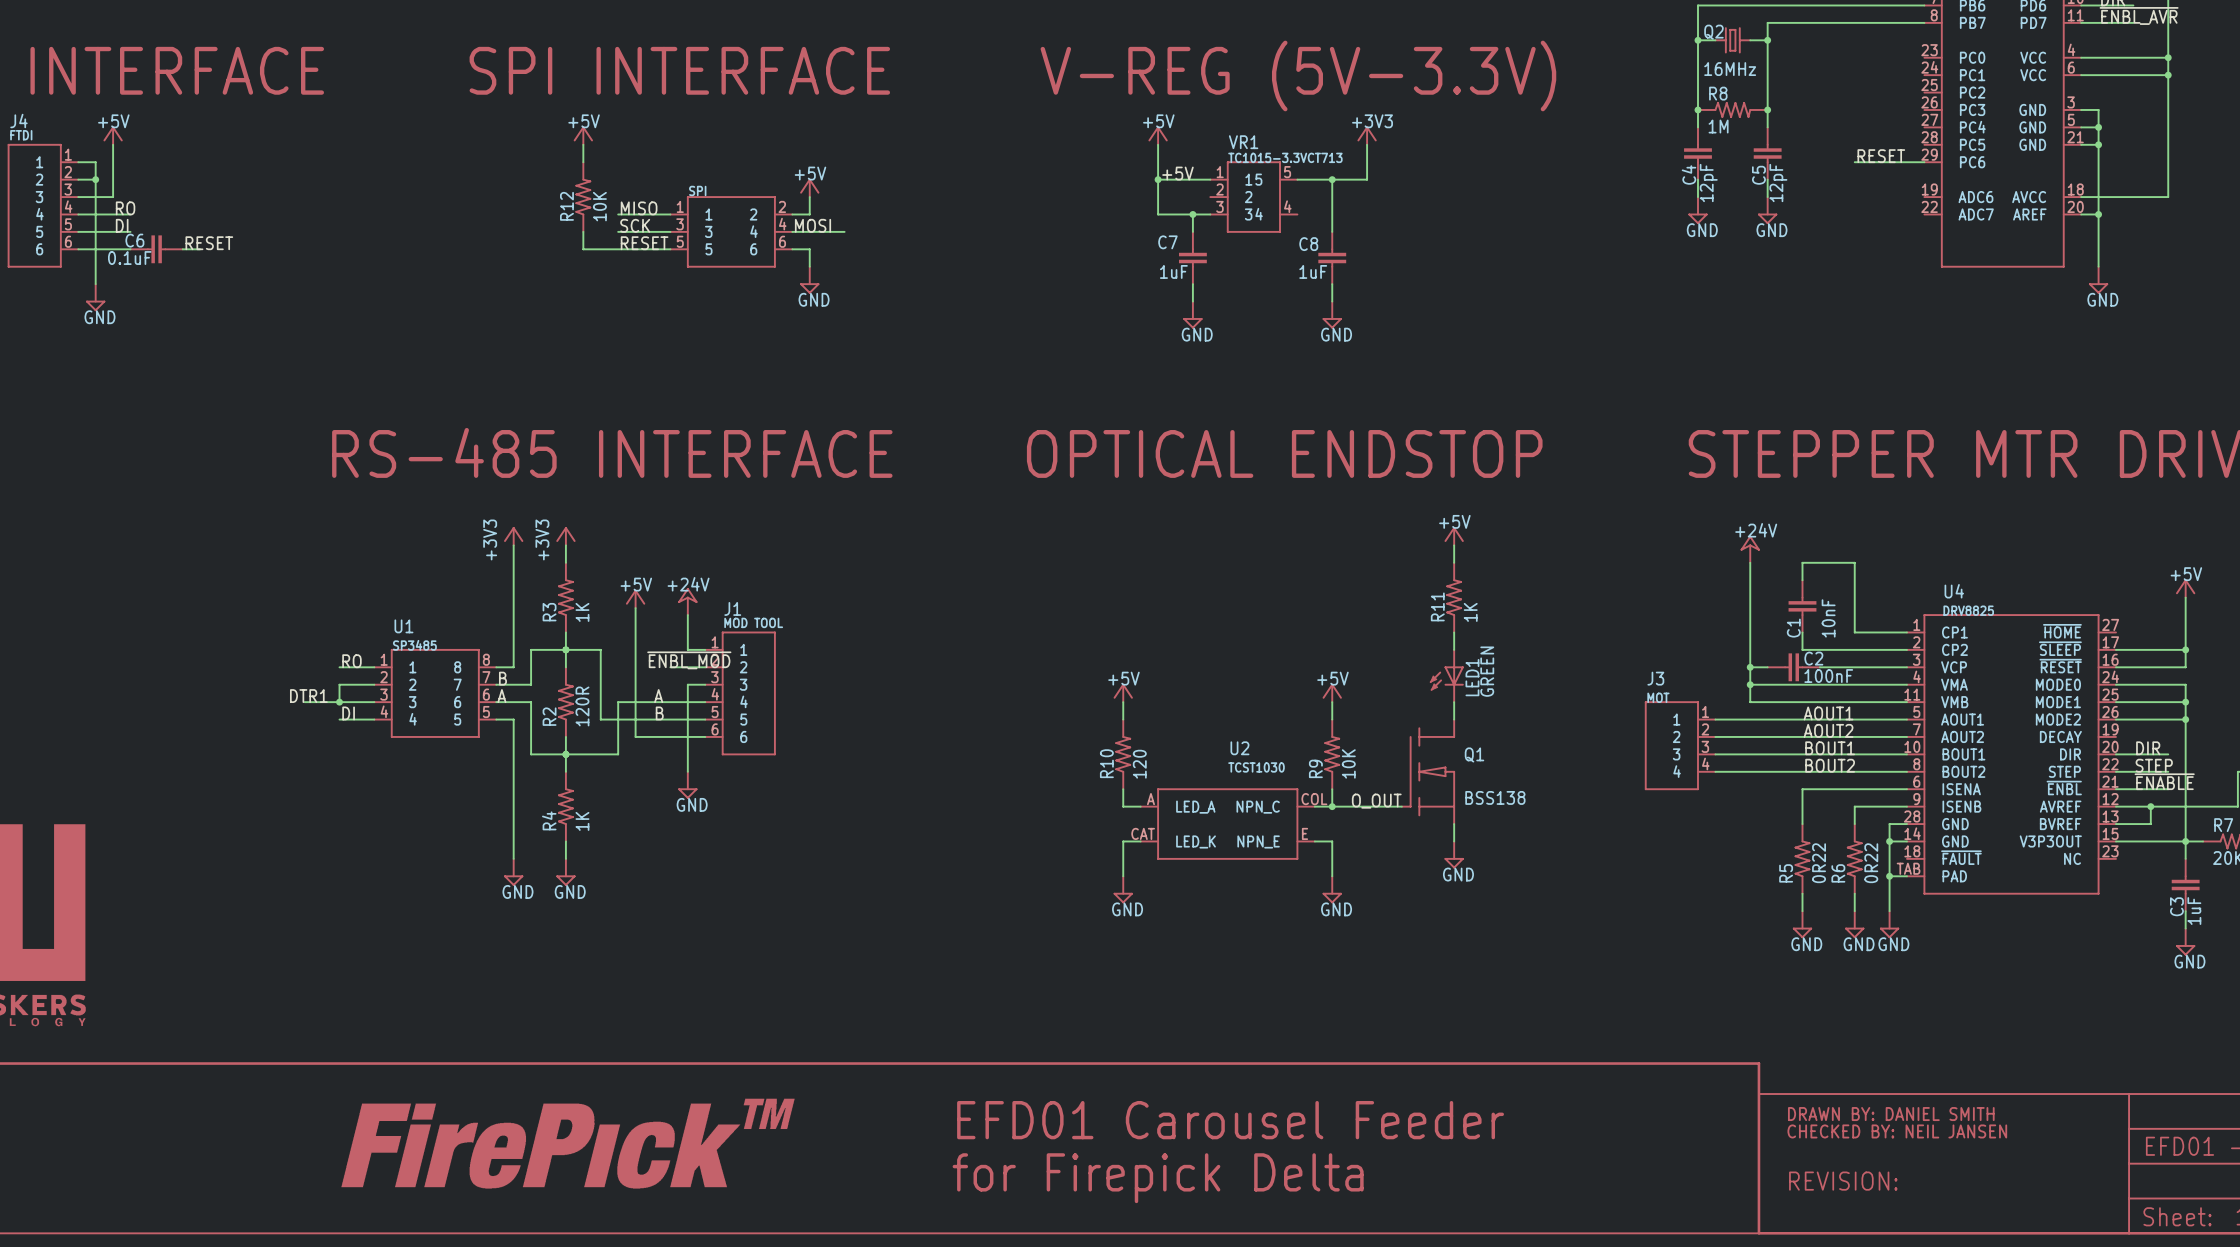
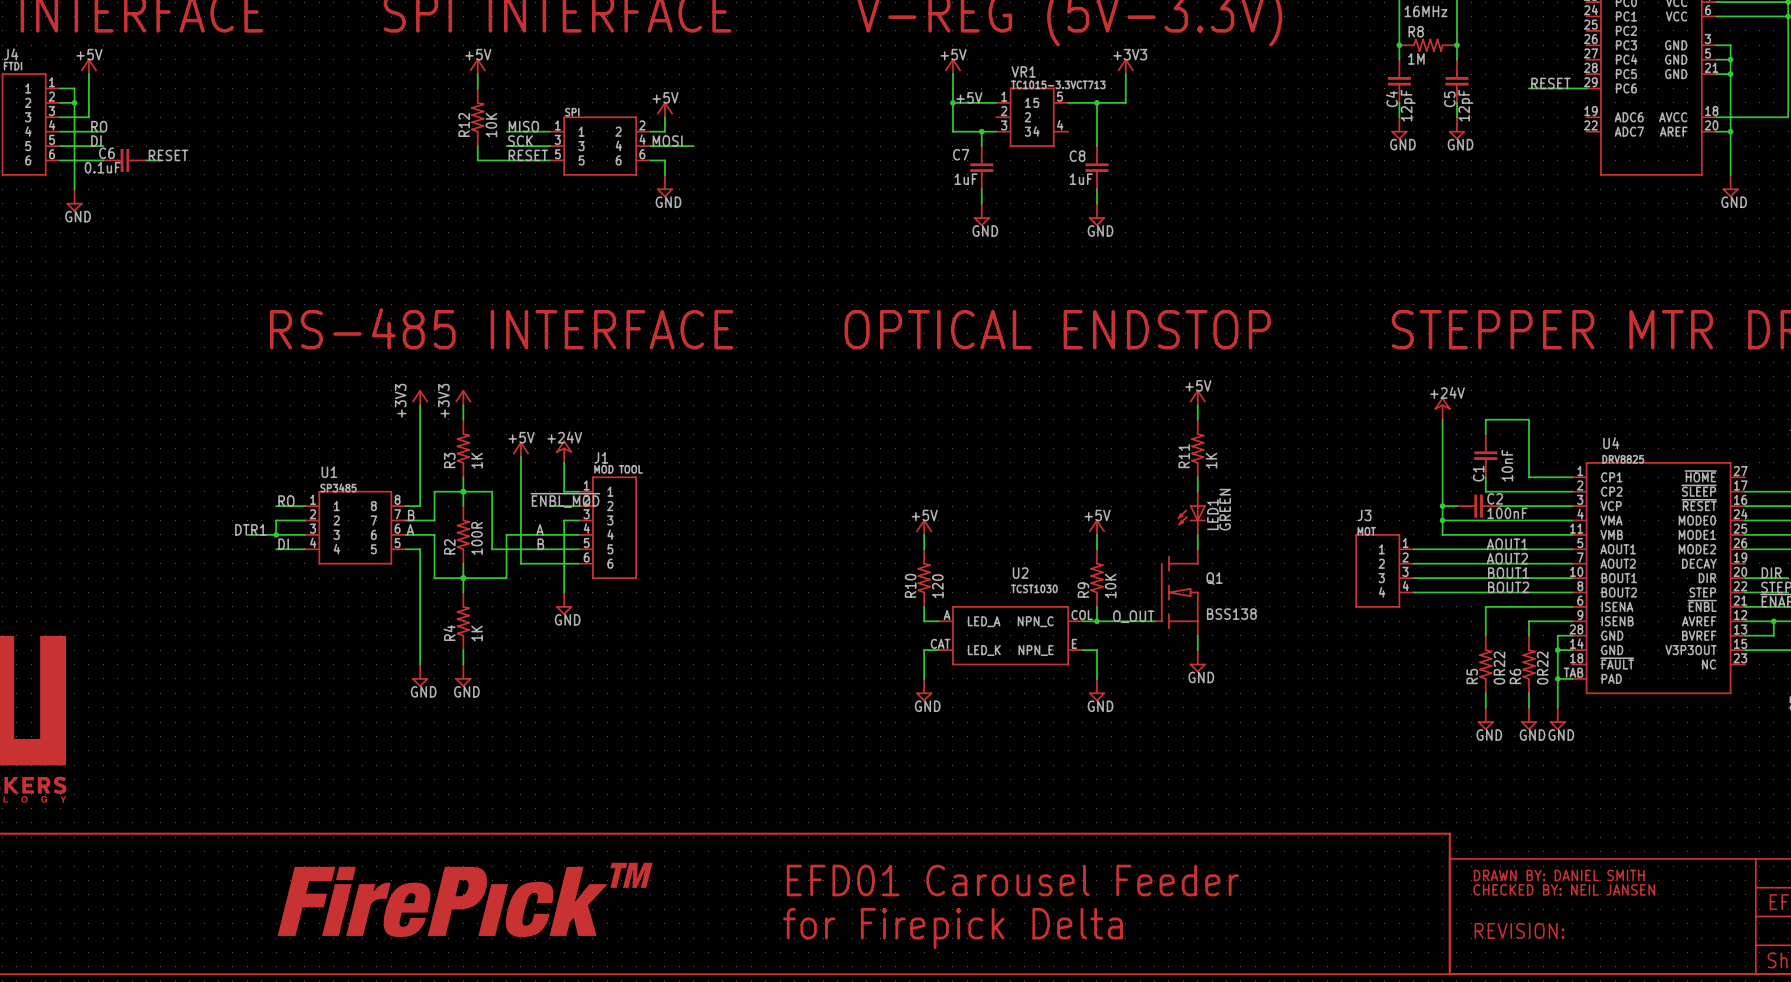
R2 value: 120R (582, 706) -> 100R (477, 538)

